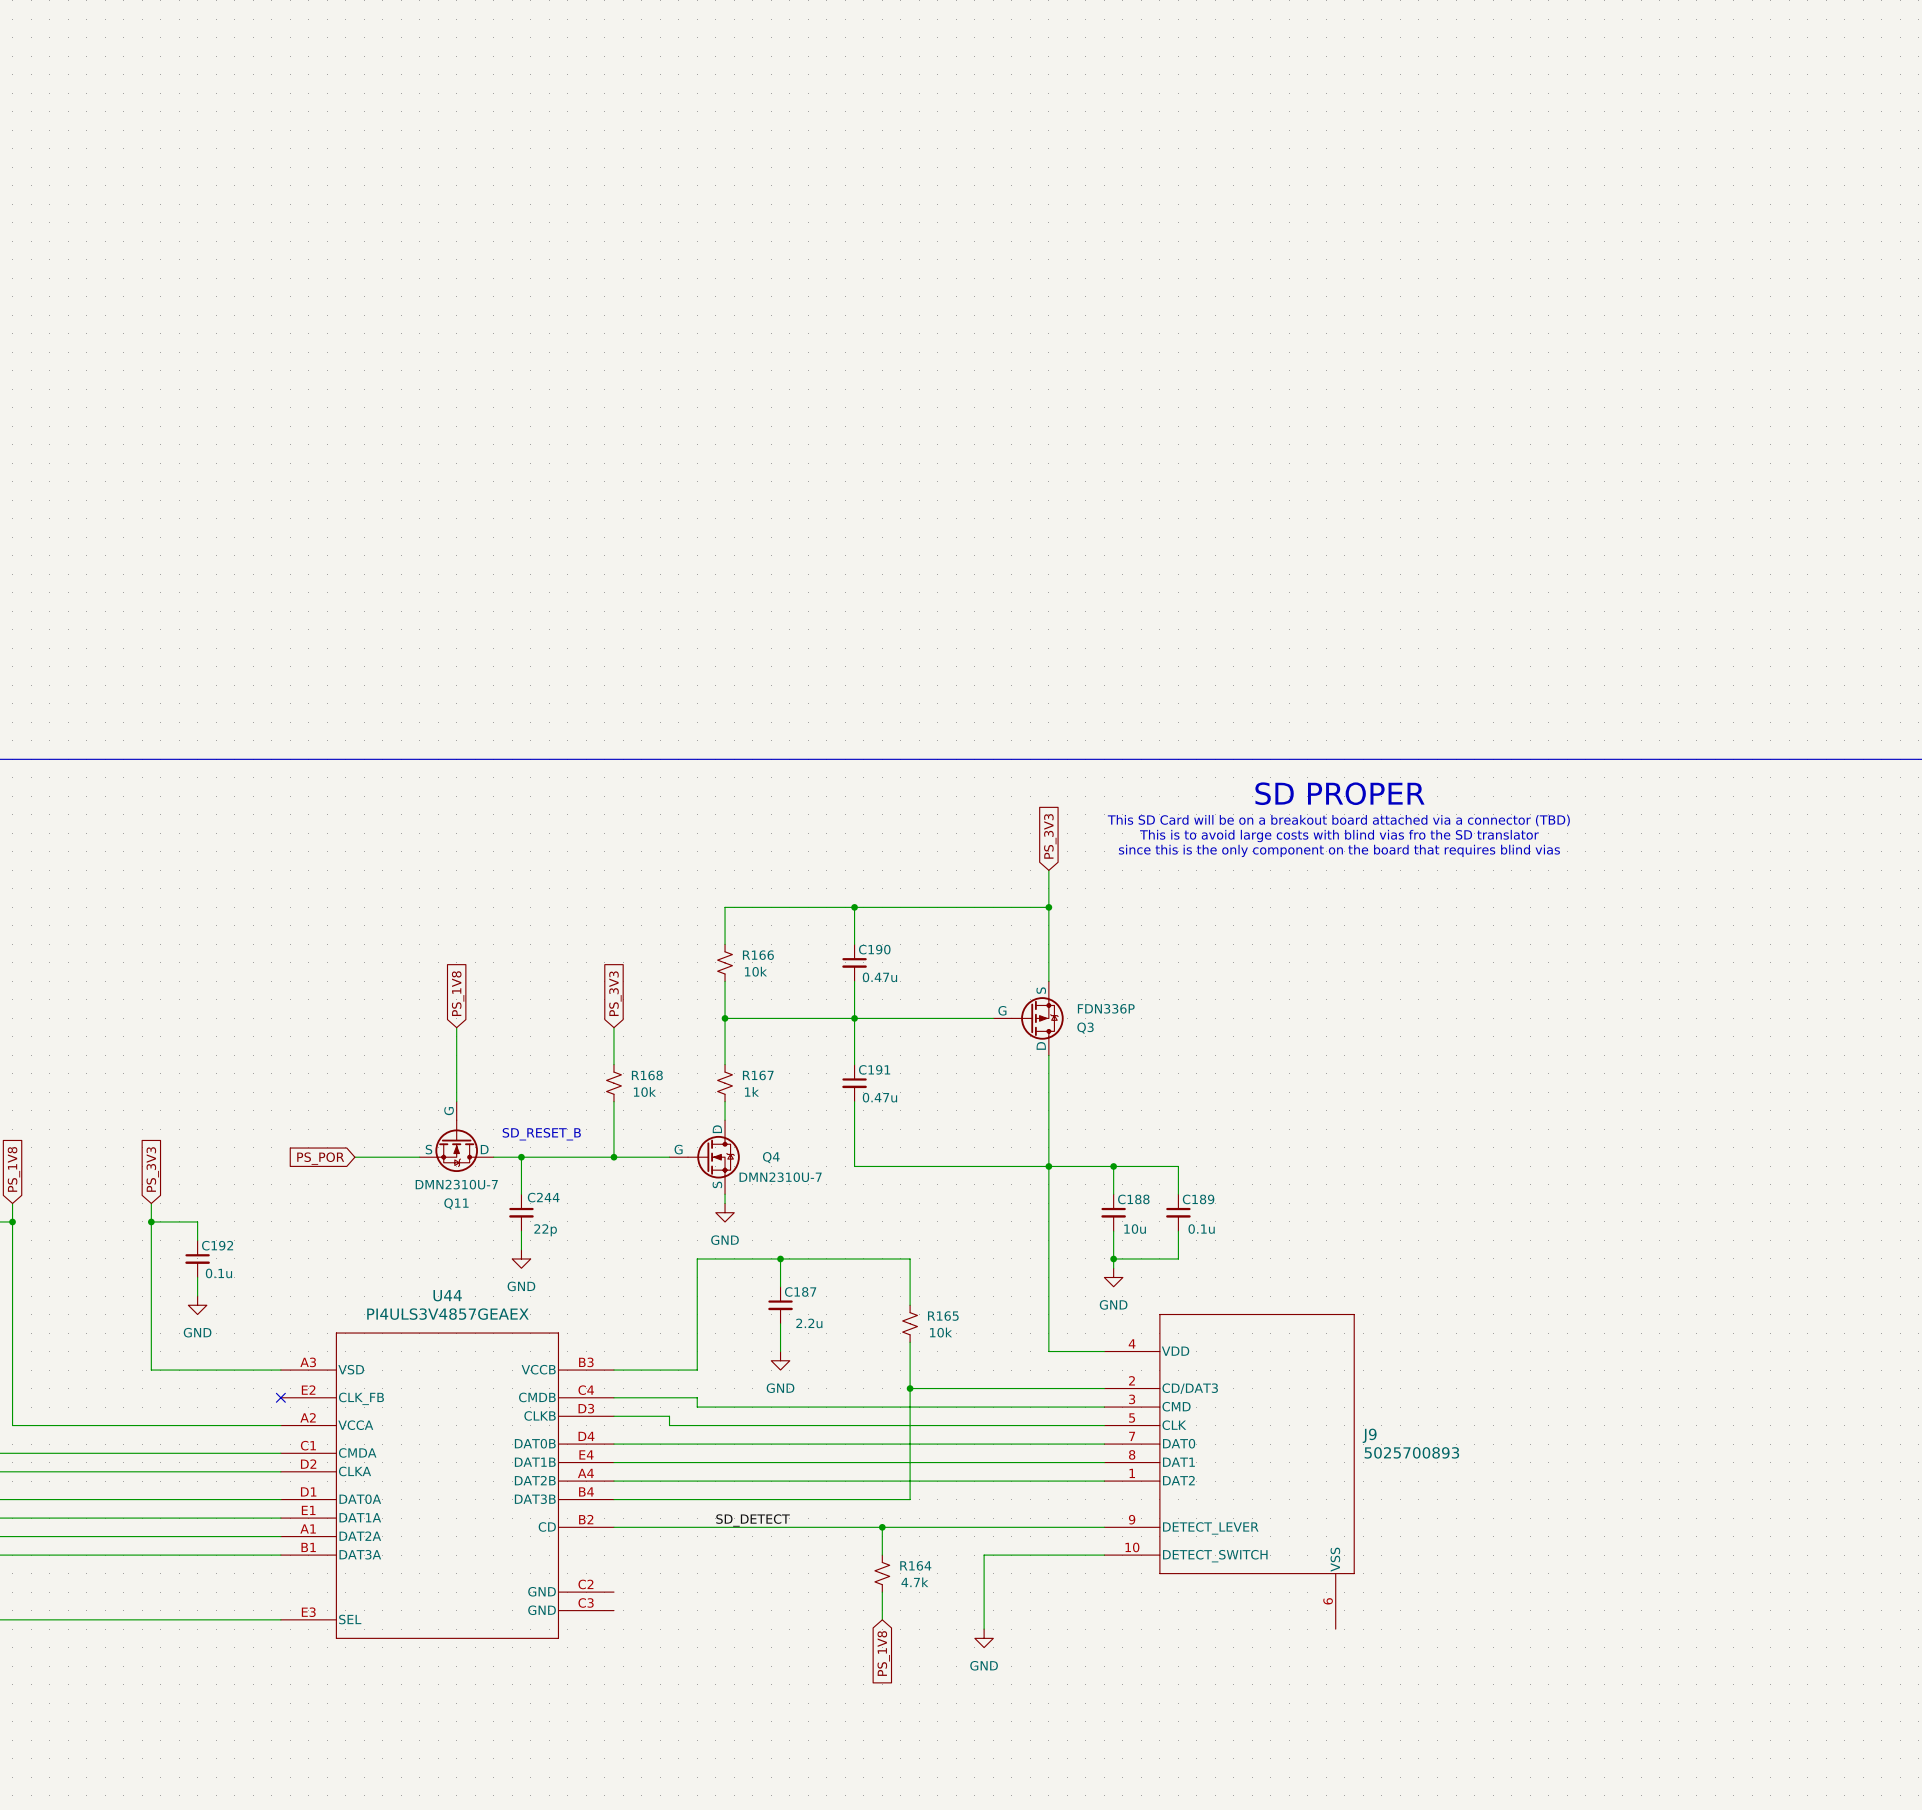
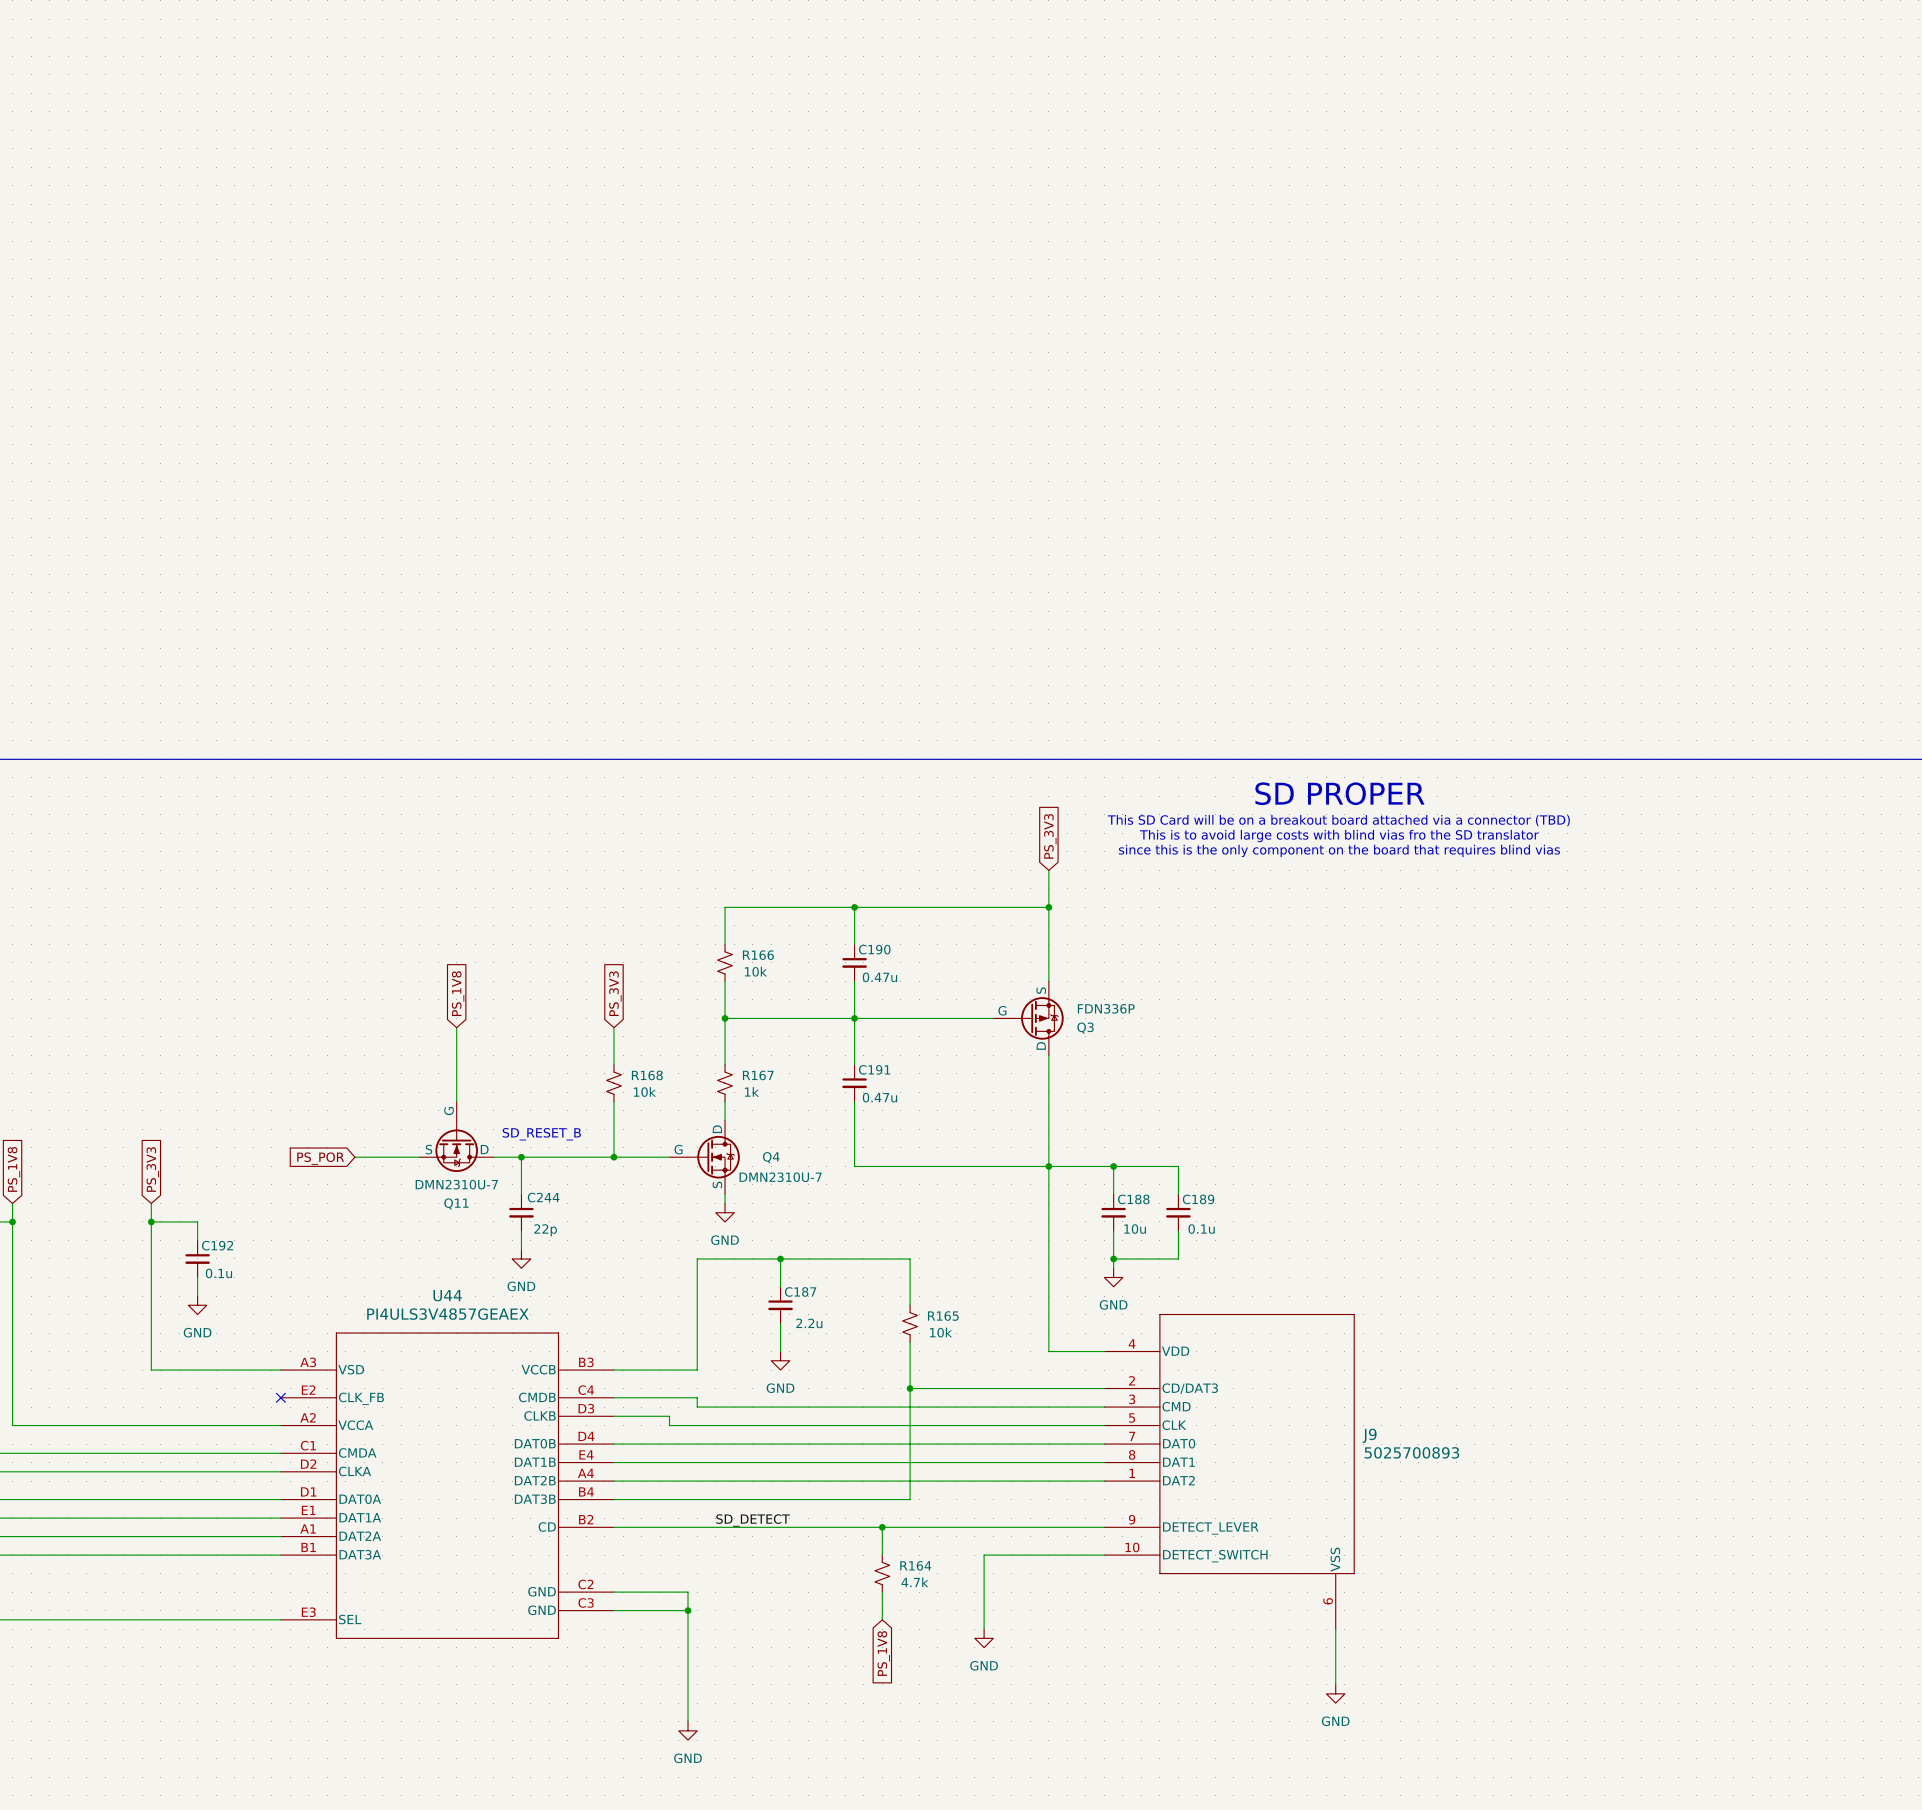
wire: none -> (613, 1592) (688, 1592) (688, 1721)
wire: none -> (613, 1610) (688, 1610)
junction: none -> (688, 1610)
wire: none -> (1335, 1629) (1335, 1684)
power symbol: none -> GND (1335, 1693)
power symbol: none -> GND (688, 1730)

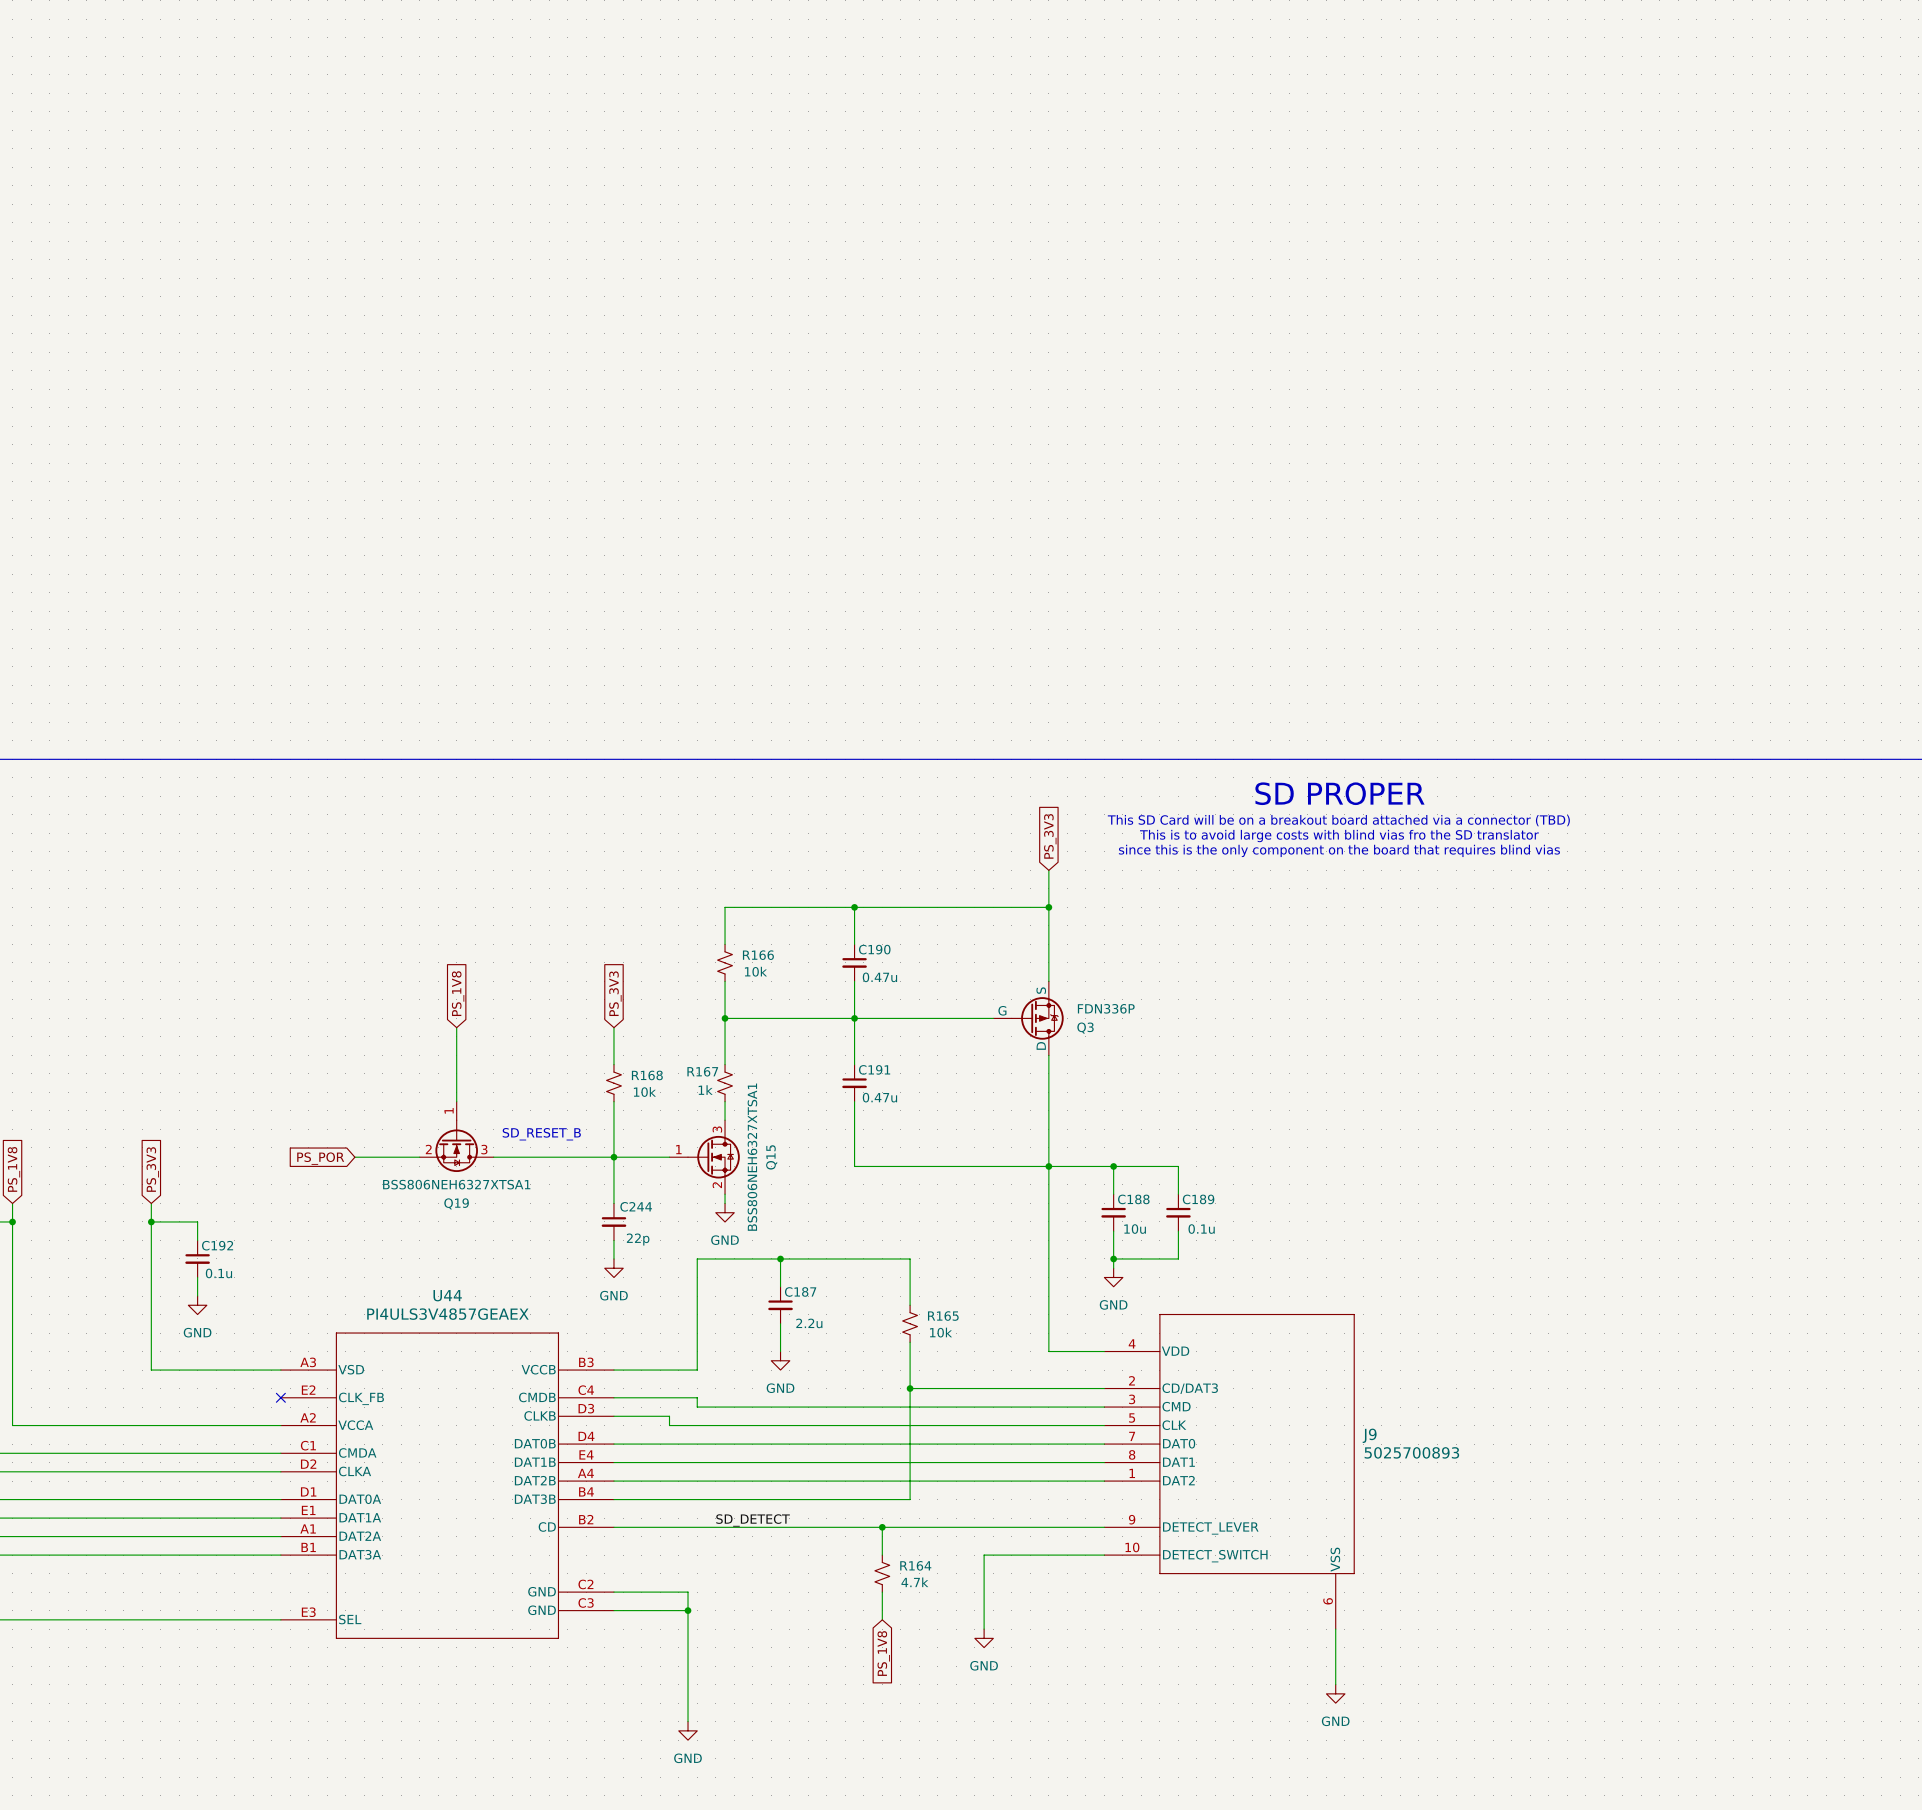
R167 name position: R167 (758, 1075) -> R167 (702, 1071)
R167 value position: 1k (751, 1091) -> 1k (705, 1090)
Q11: DMN2310U-7 (456, 1136) -> none
Q19: none -> BSS806NEH6327XTSA1 (456, 1136)
wire: (521, 1157) (521, 1194) -> none
junction: (521, 1157) -> none
wire: none -> (613, 1157) (613, 1203)
Q4: DMN2310U-7 (704, 1157) -> none
Q15: none -> BSS806NEH6327XTSA1 (704, 1157)
C244 position: (521, 1212) -> (613, 1221)
wire: (521, 1231) (521, 1249) -> (613, 1240) (613, 1258)
power symbol position: GND (521, 1258) -> GND (613, 1268)

